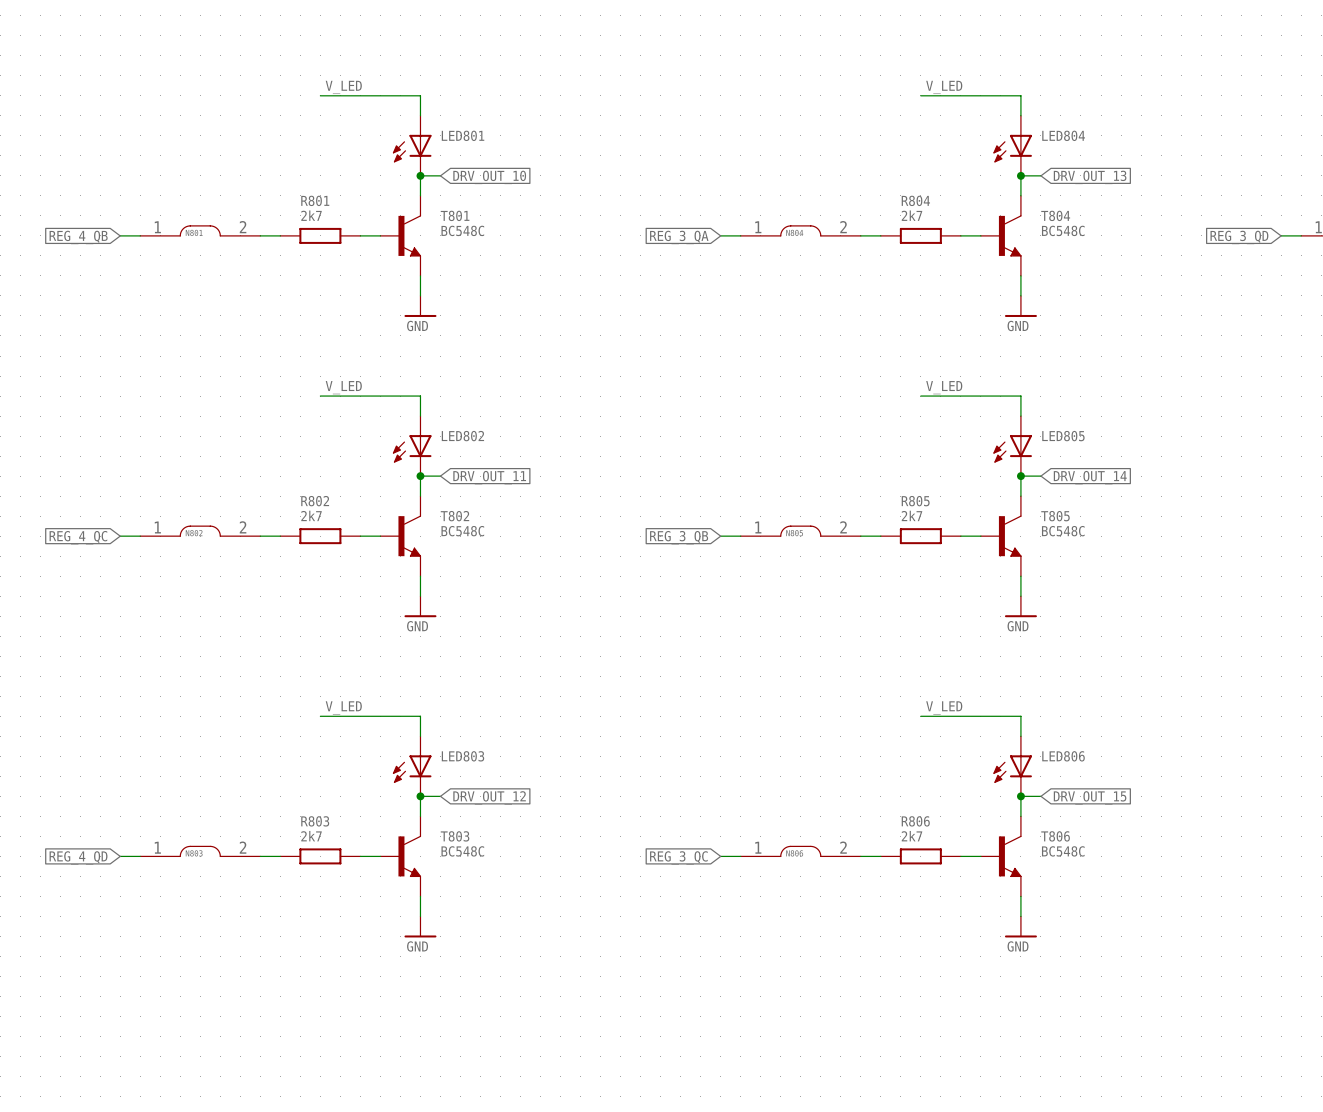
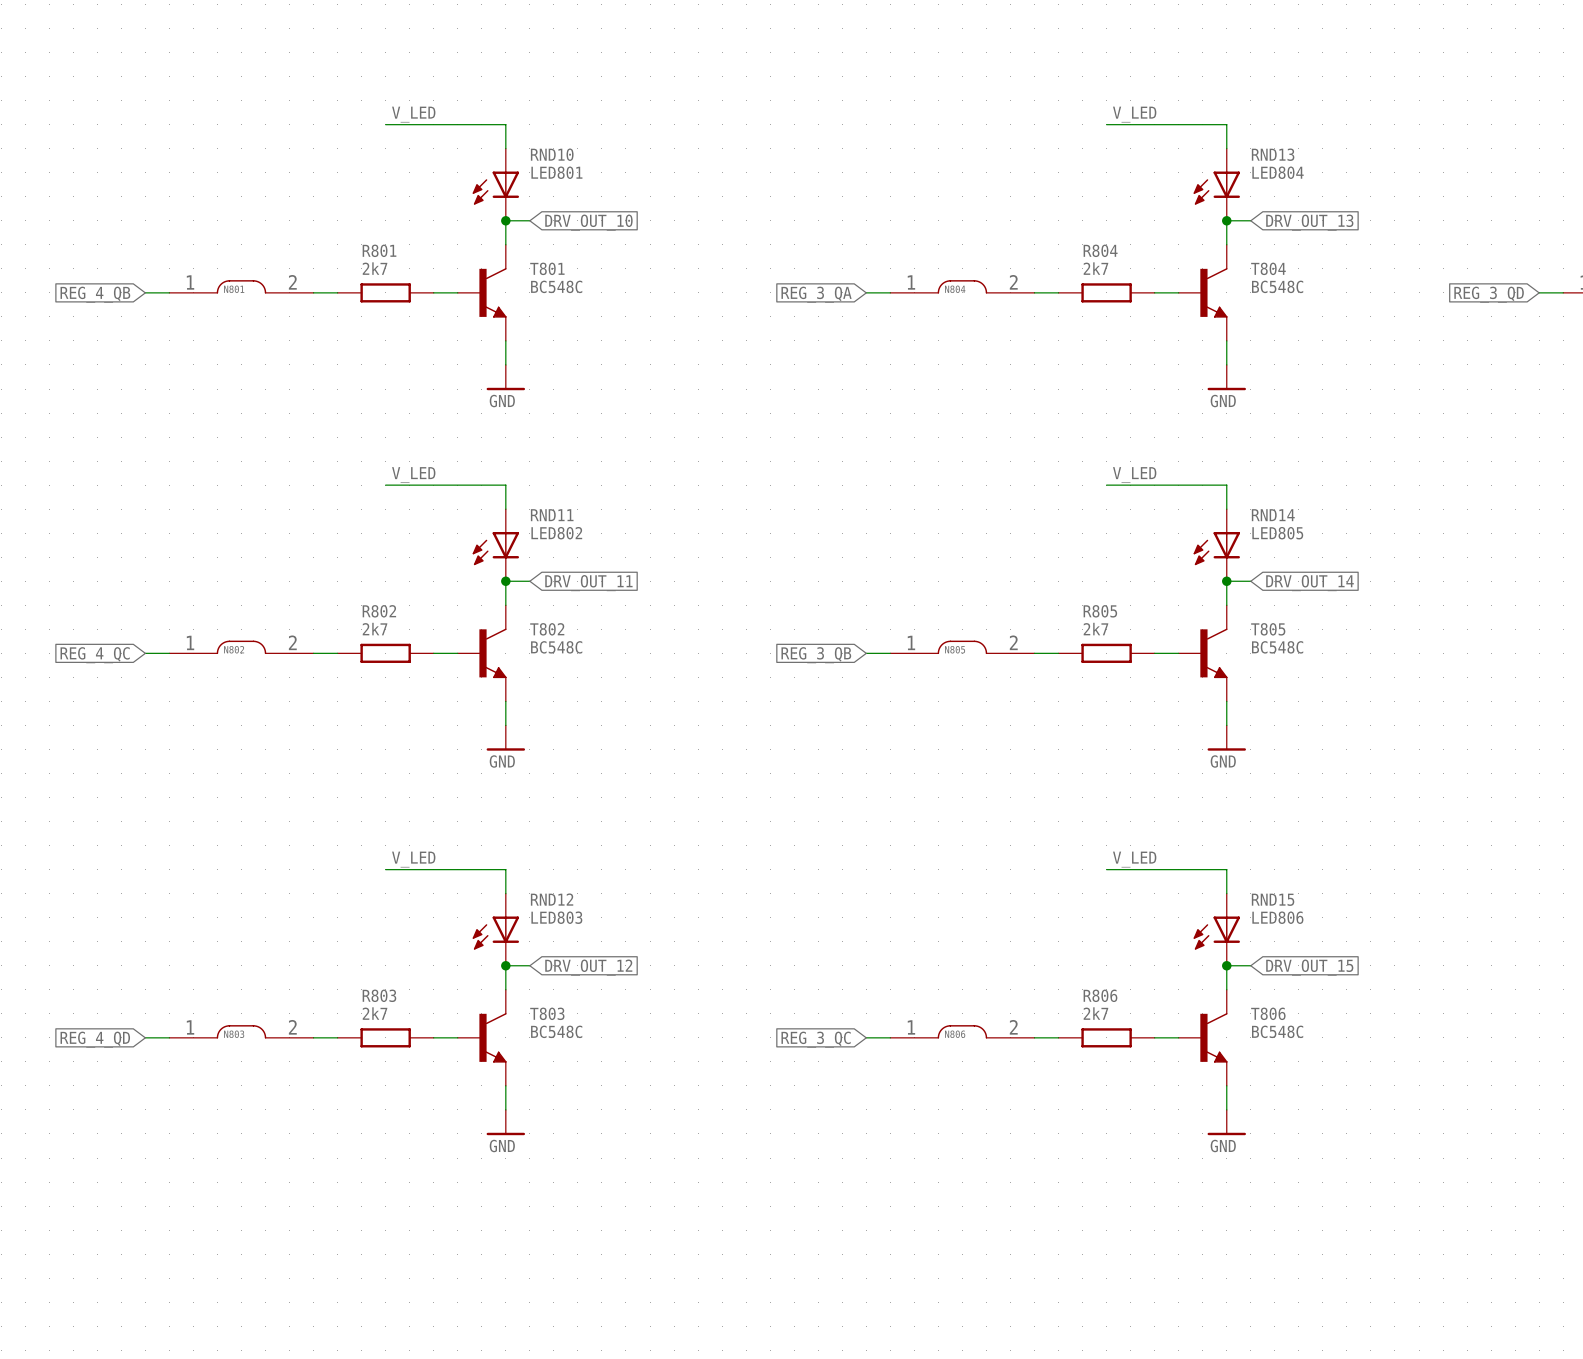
LED801 text: none -> RND10 (552, 154)
LED804 text: none -> RND13 (1273, 154)
LED802 text: none -> RND11 (552, 515)
LED805 text: none -> RND14 (1273, 515)
LED803 text: none -> RND12 (552, 899)
LED806 text: none -> RND15 (1273, 899)

